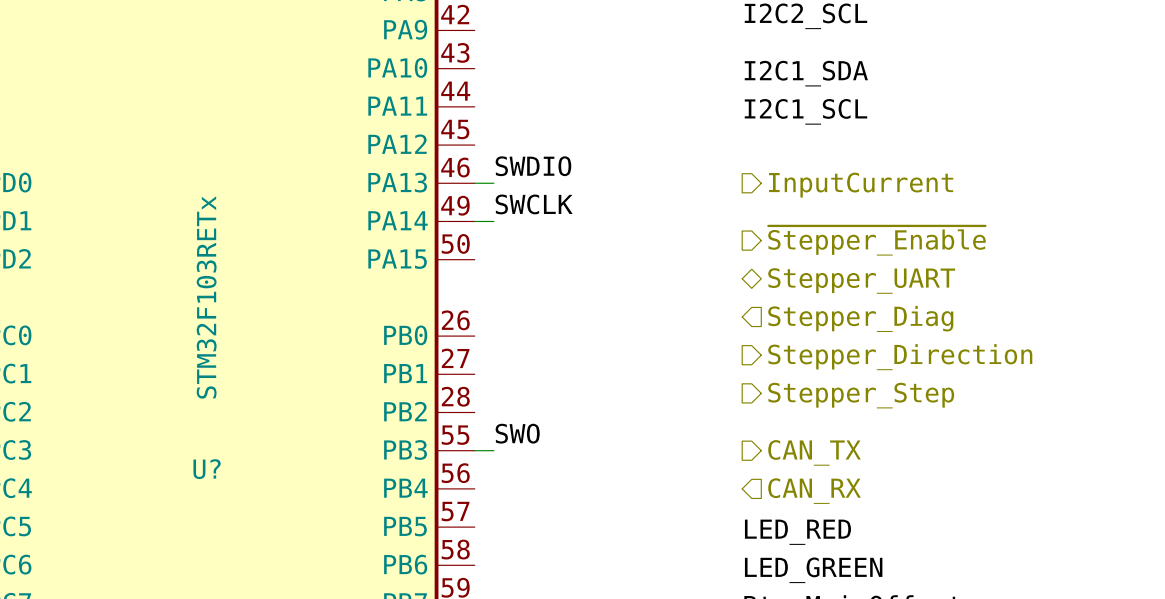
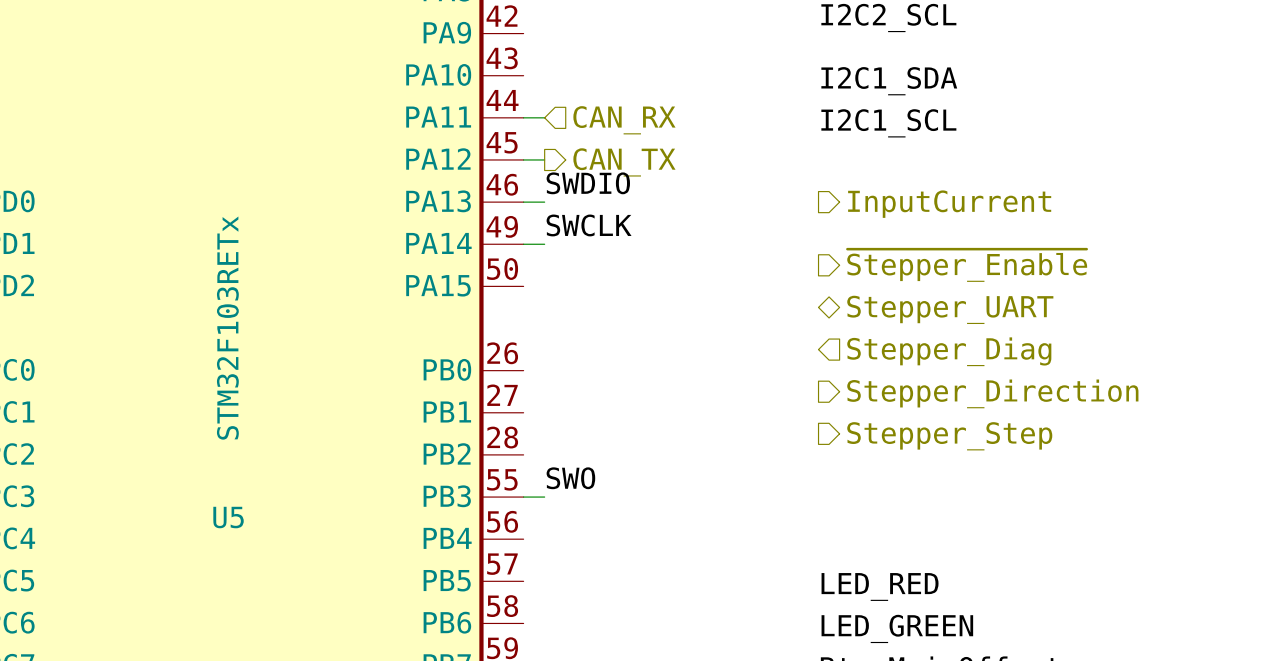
wire: none -> (523, 117) (544, 117)
hierarchical label: none -> CAN_RX (624, 120)
wire: none -> (523, 159) (544, 159)
hierarchical label: none -> CAN_TX (624, 162)
hierarchical label: CAN_TX (814, 452) -> none
U? name: U? (207, 469) -> U5 (228, 517)
hierarchical label: CAN_RX (814, 491) -> none

